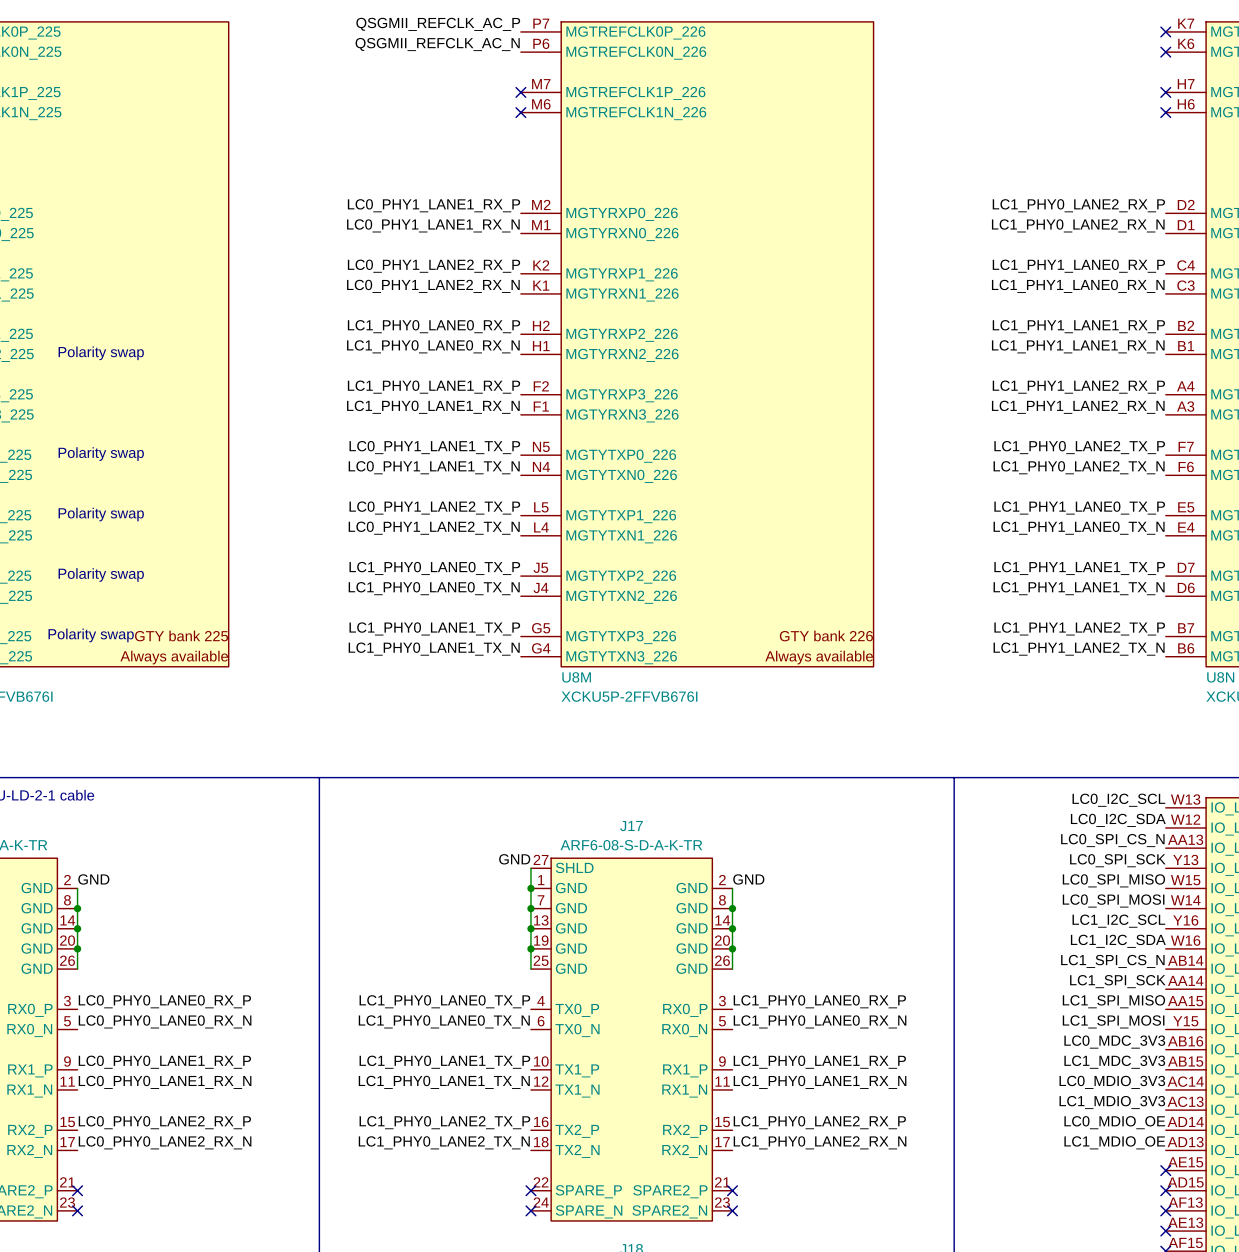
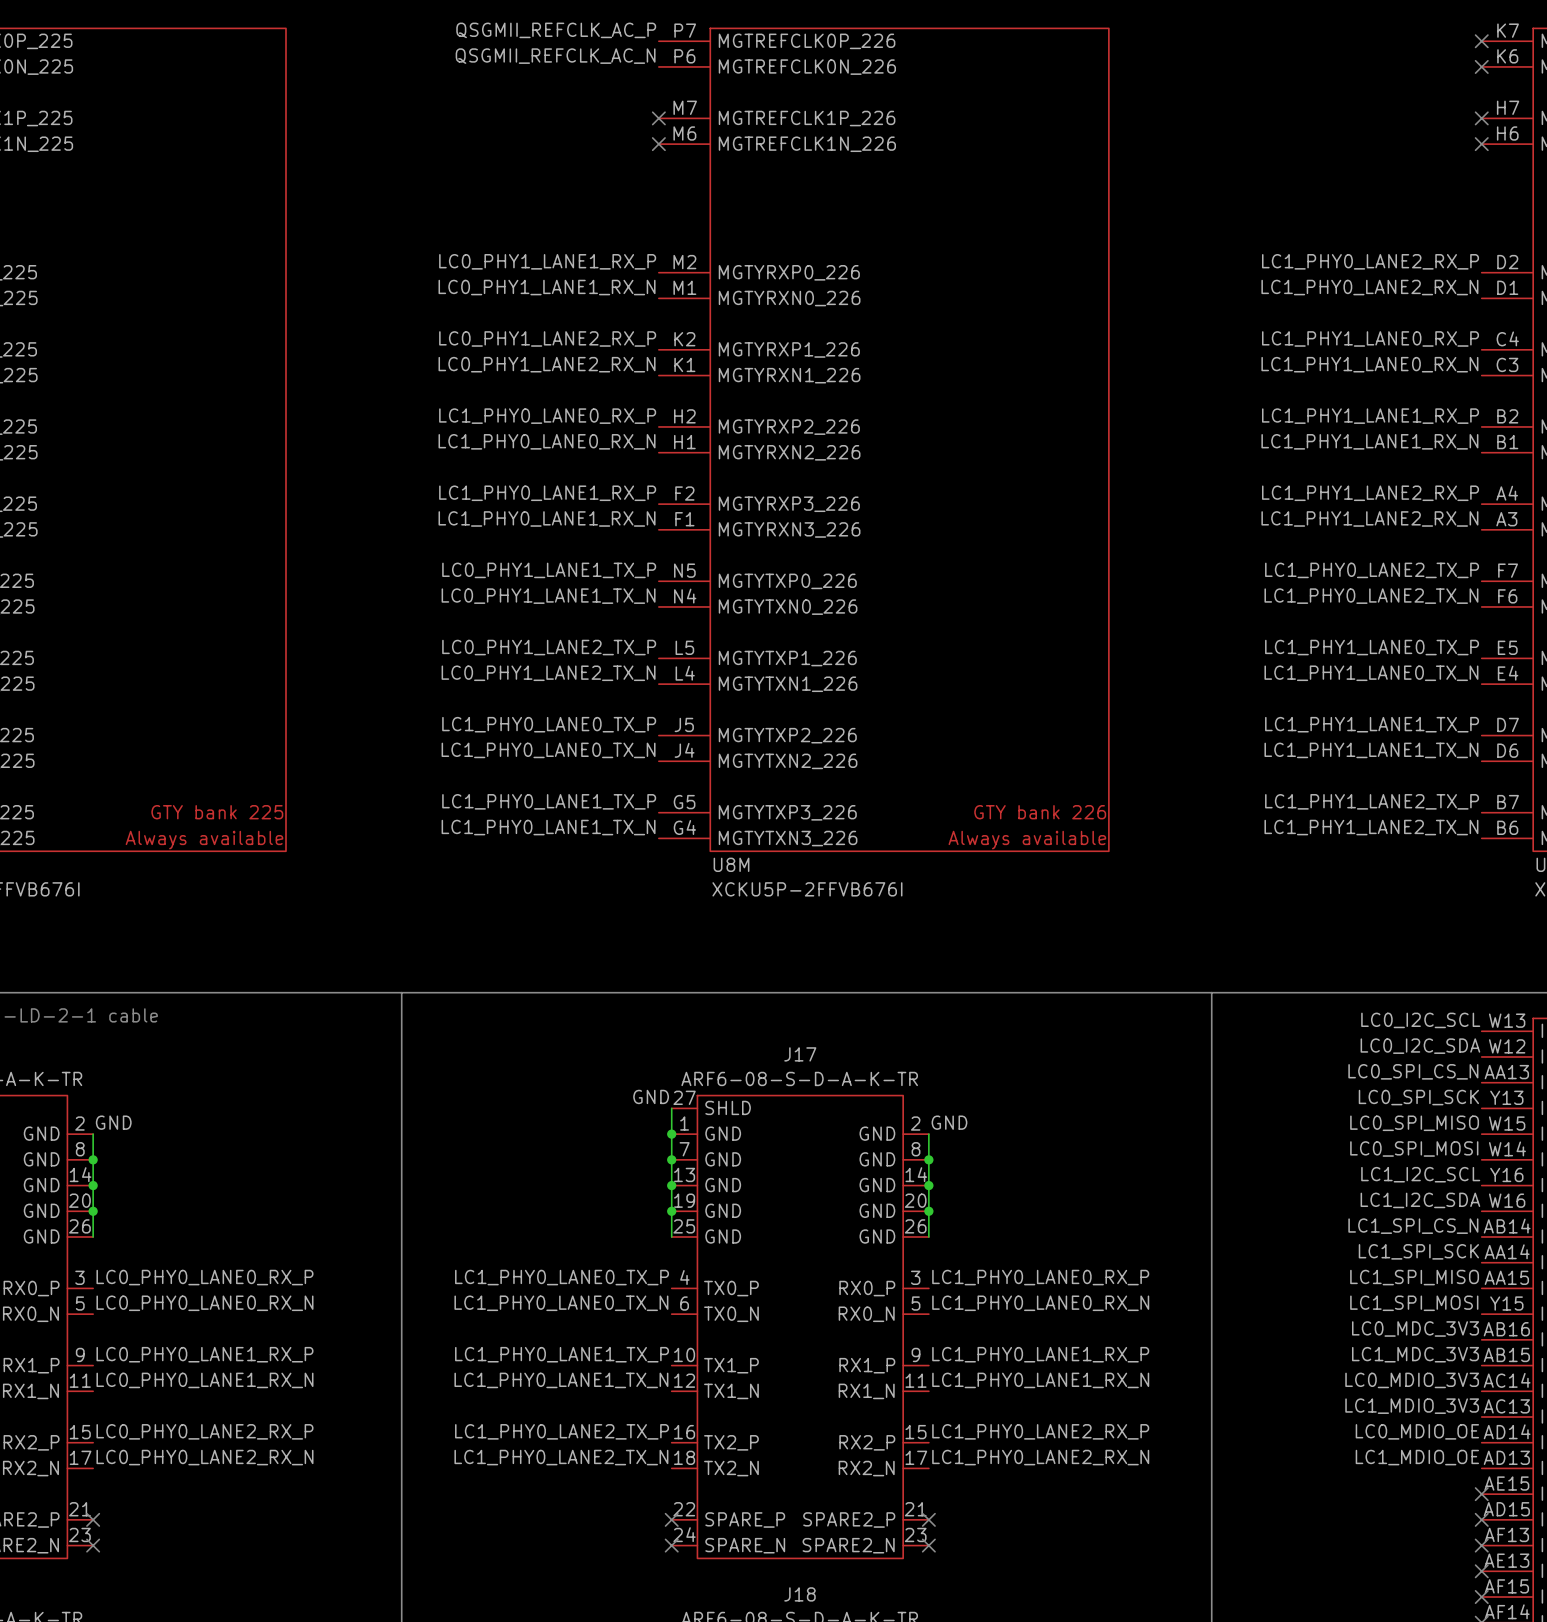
text: Polarity swap (101, 353) -> none
text: Polarity swap (101, 454) -> none
text: Polarity swap (101, 514) -> none
text: Polarity swap (101, 574) -> none
text: Polarity swap (91, 635) -> none

